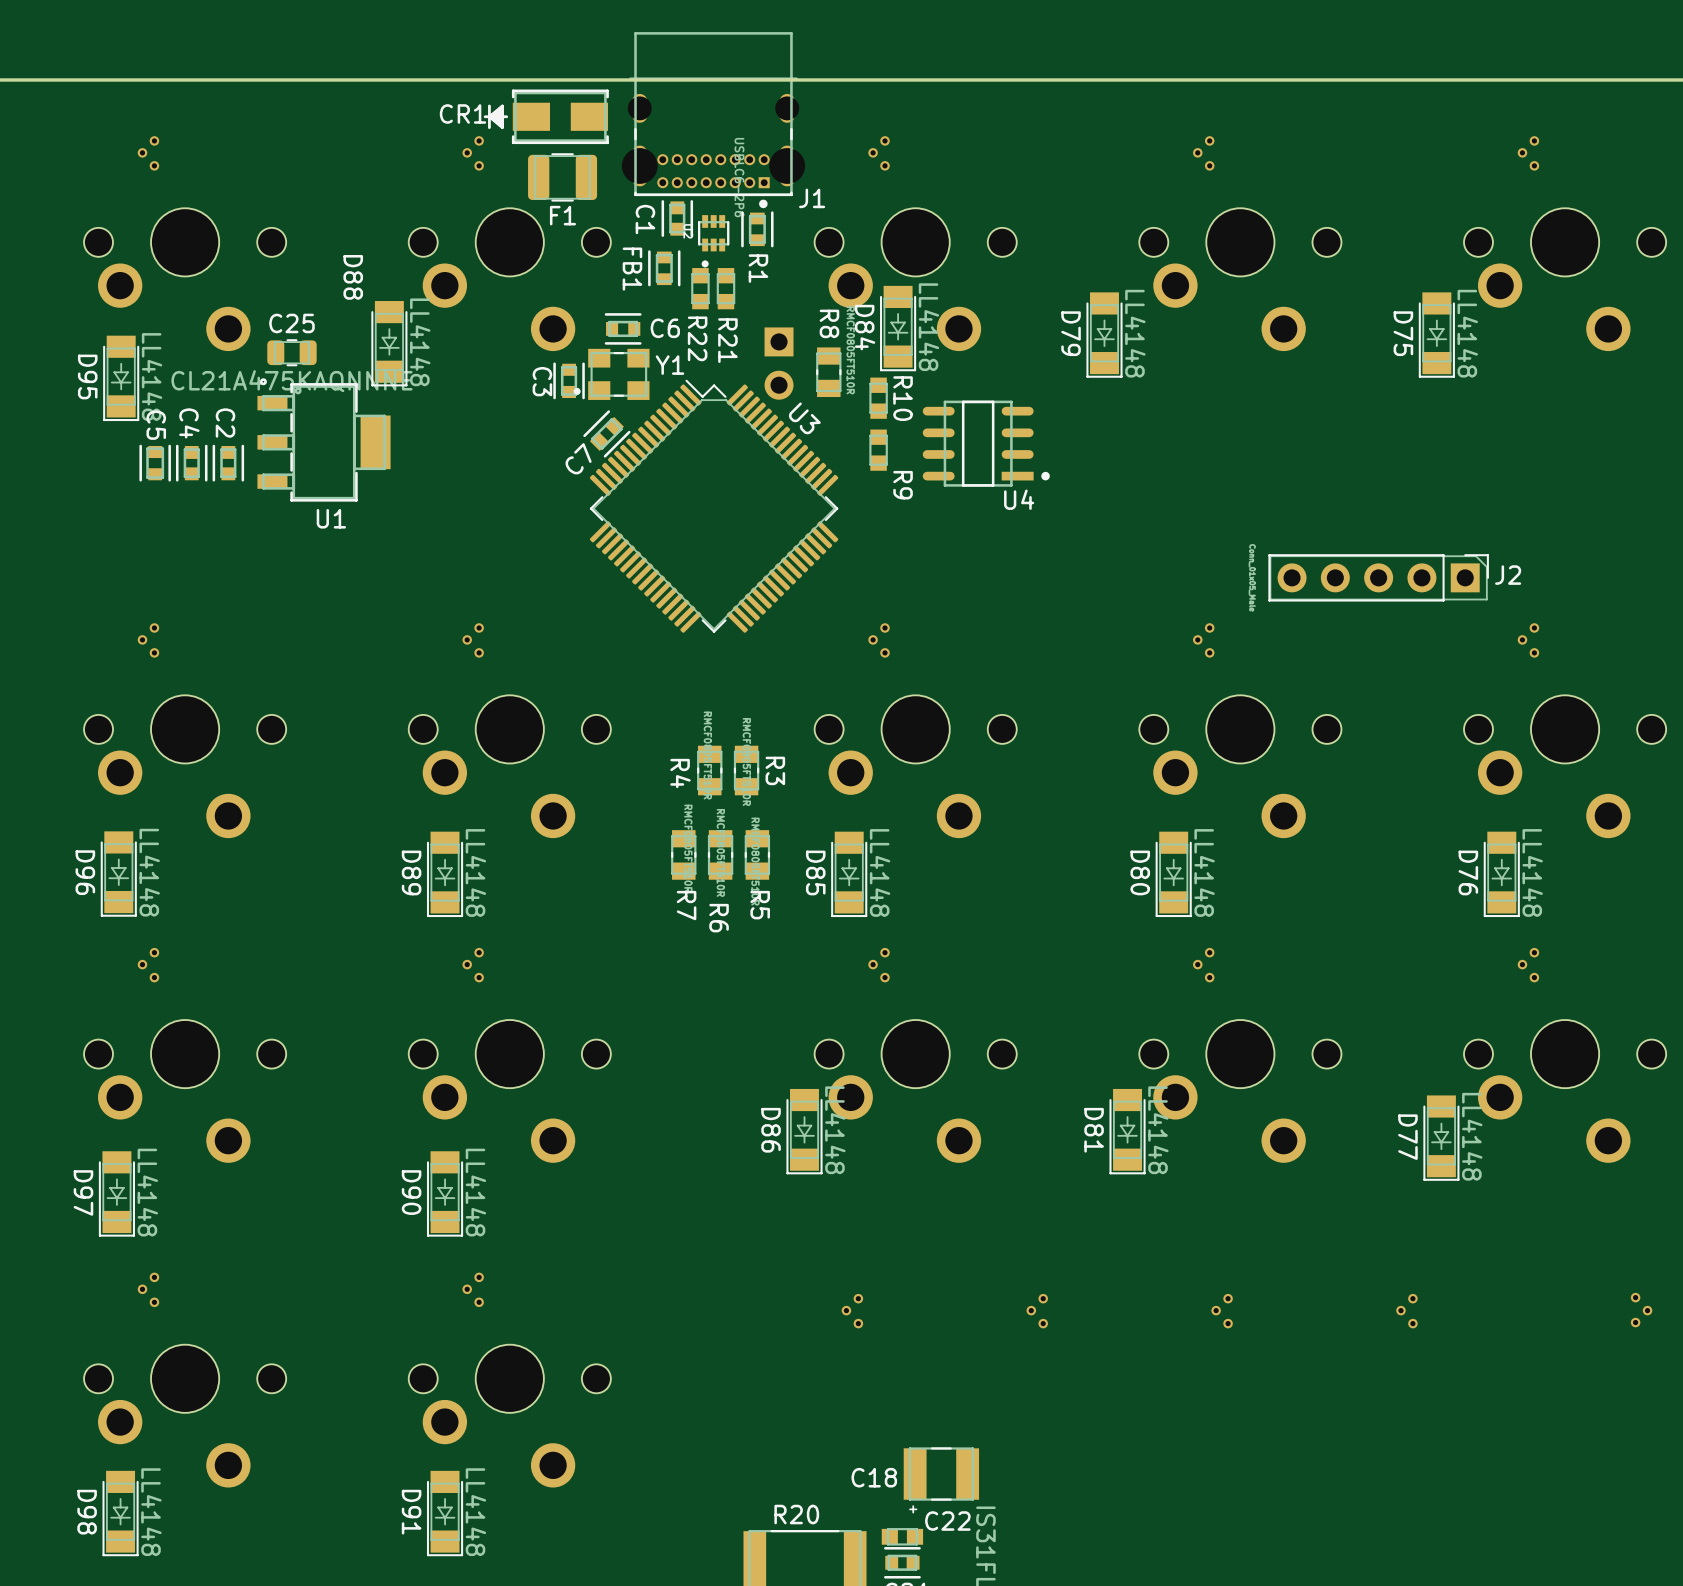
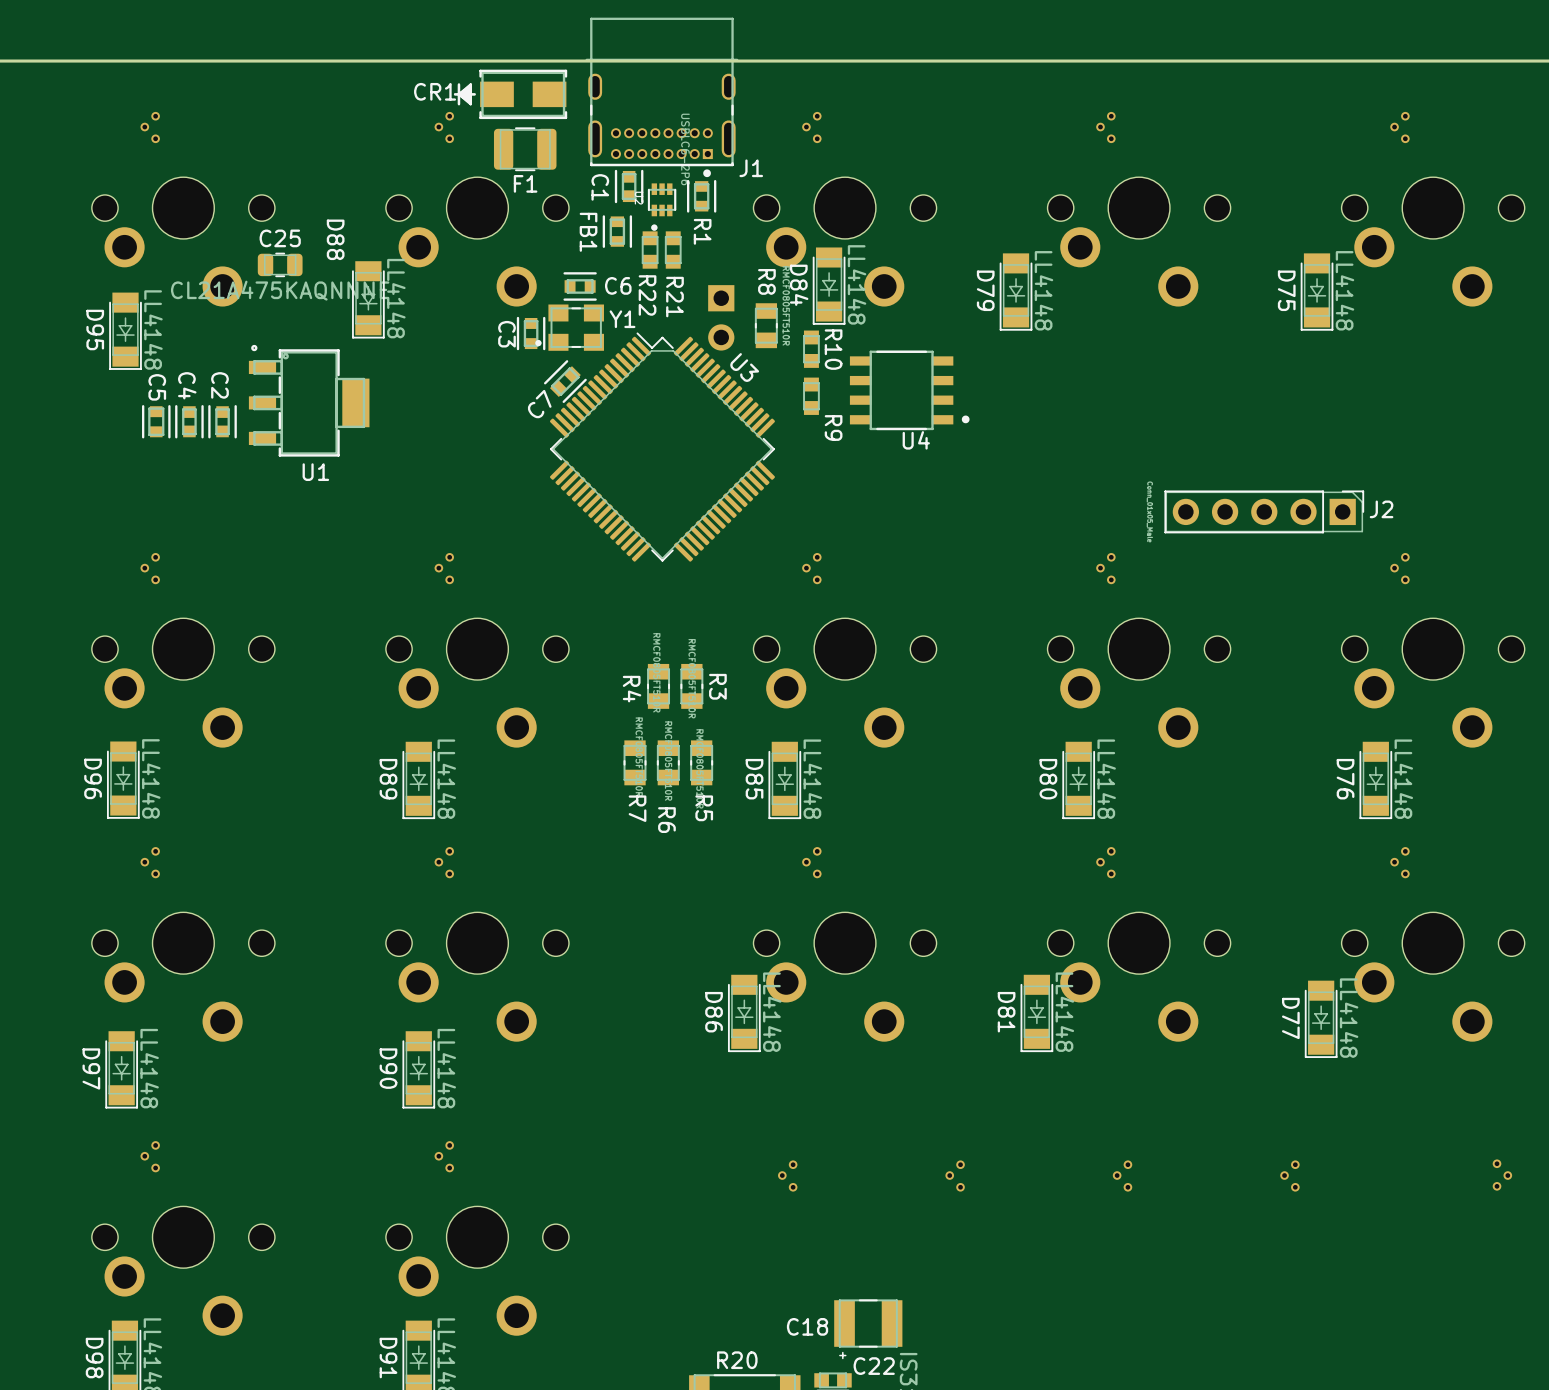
J1 footprint: [621, 32, 806, 209] -> [585, 17, 739, 178]
C25 position: (291, 352) -> (280, 264)
U4 footprint: [922, 400, 1050, 487] -> [849, 350, 970, 431]
U1 position: (324, 439) -> (309, 400)
C5 position: (155, 463) -> (156, 421)
C4 position: (191, 463) -> (189, 421)
C2 position: (228, 463) -> (222, 421)

